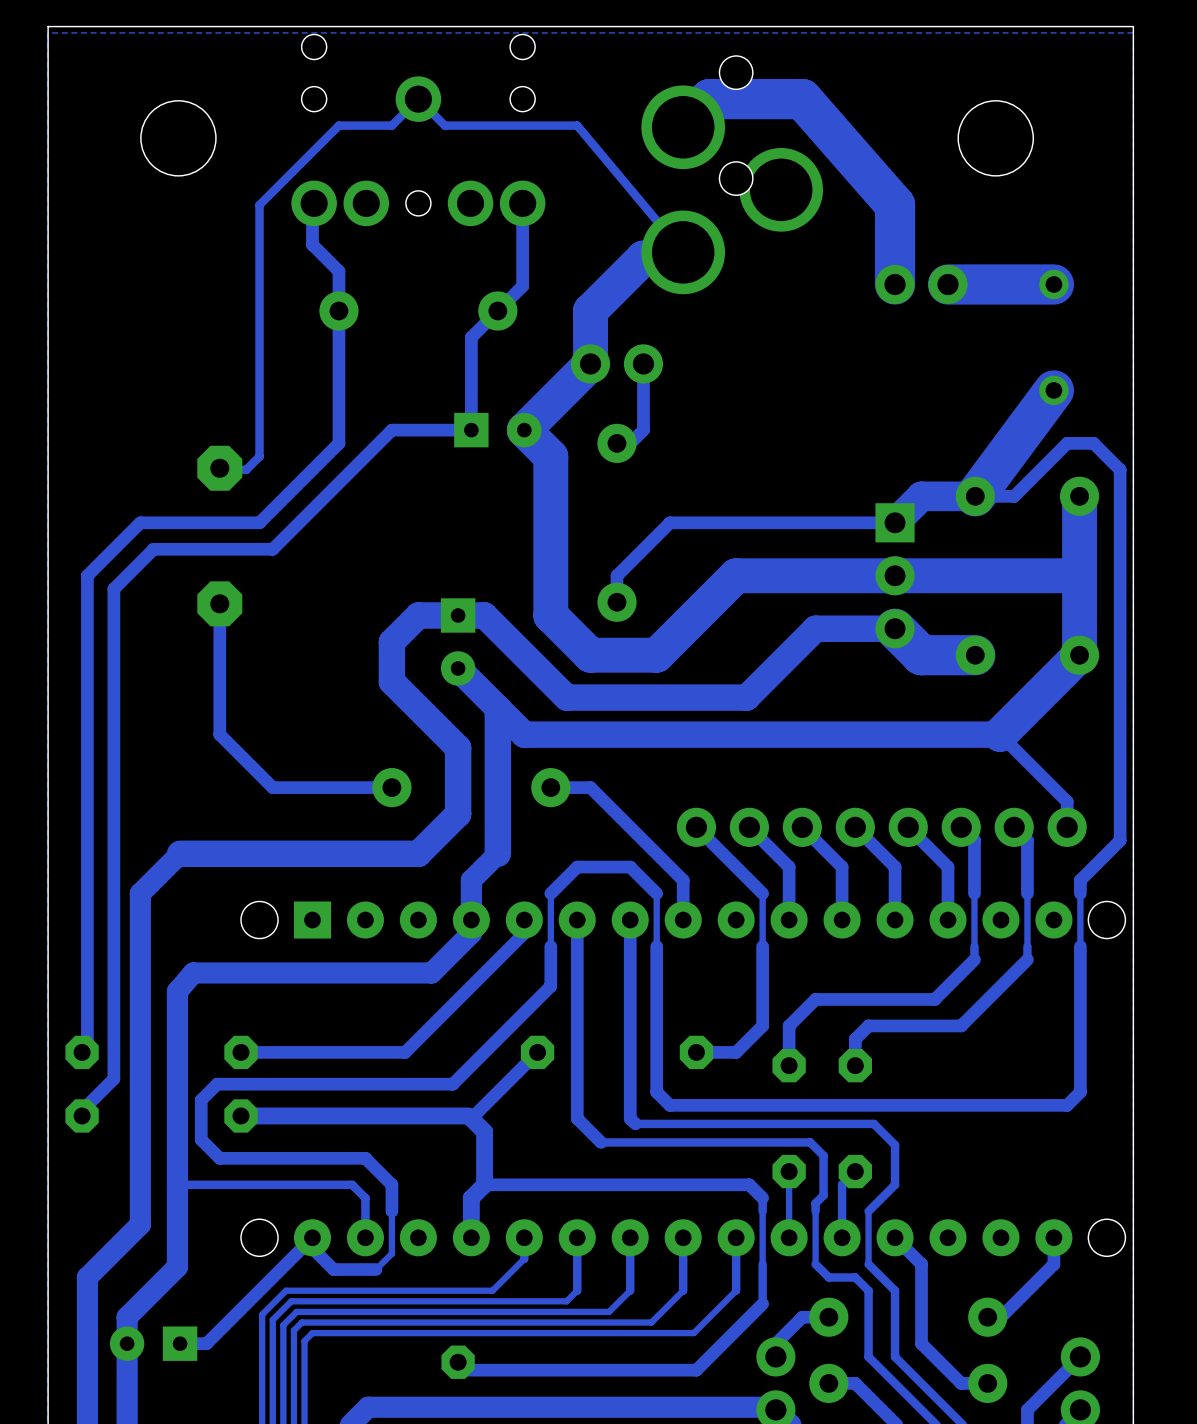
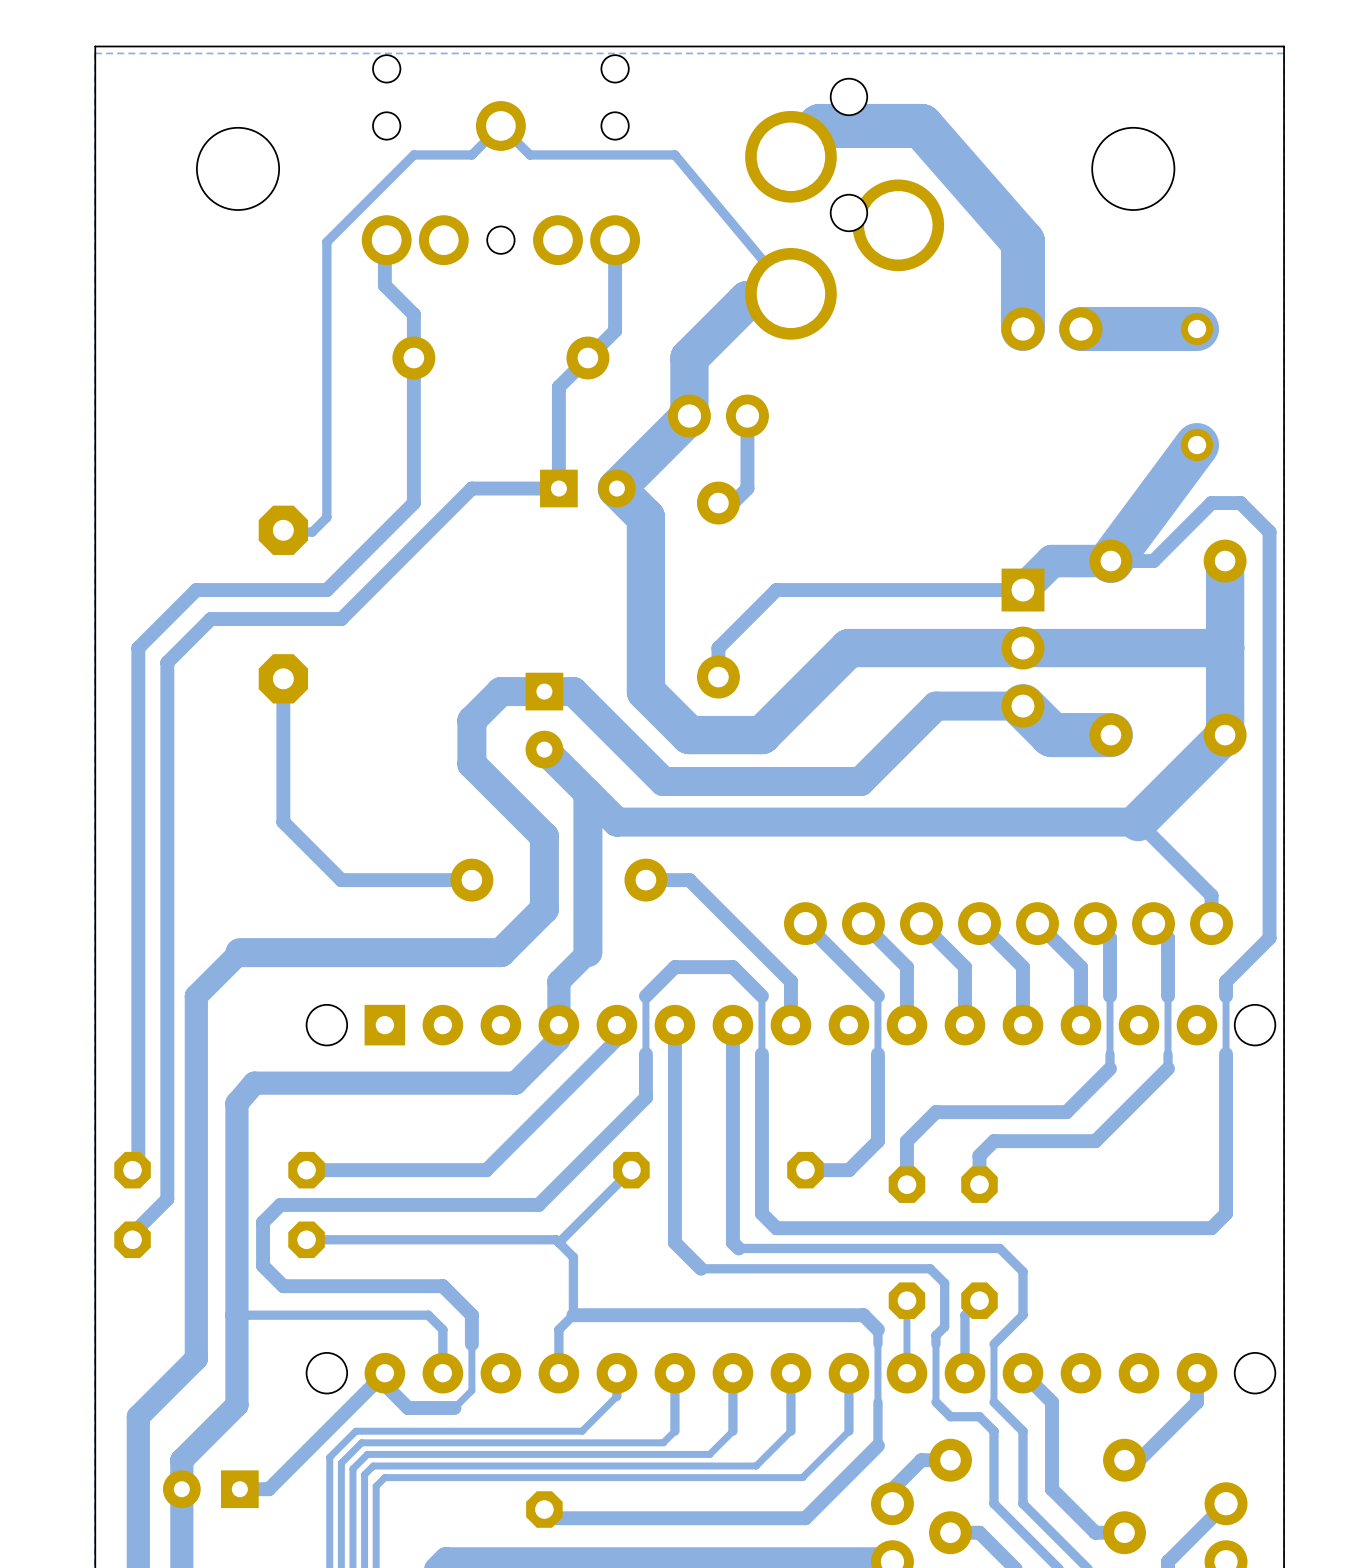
track width: thick (537, 1052) (471, 1118) (484, 1131) (484, 1184) (471, 1198) (471, 1237) -> thin (631, 1170) (558, 1242) (573, 1257) (573, 1315) (558, 1329) (558, 1373)
track width: thick (468, 1115) (240, 1115) -> thin (556, 1239) (306, 1239)

